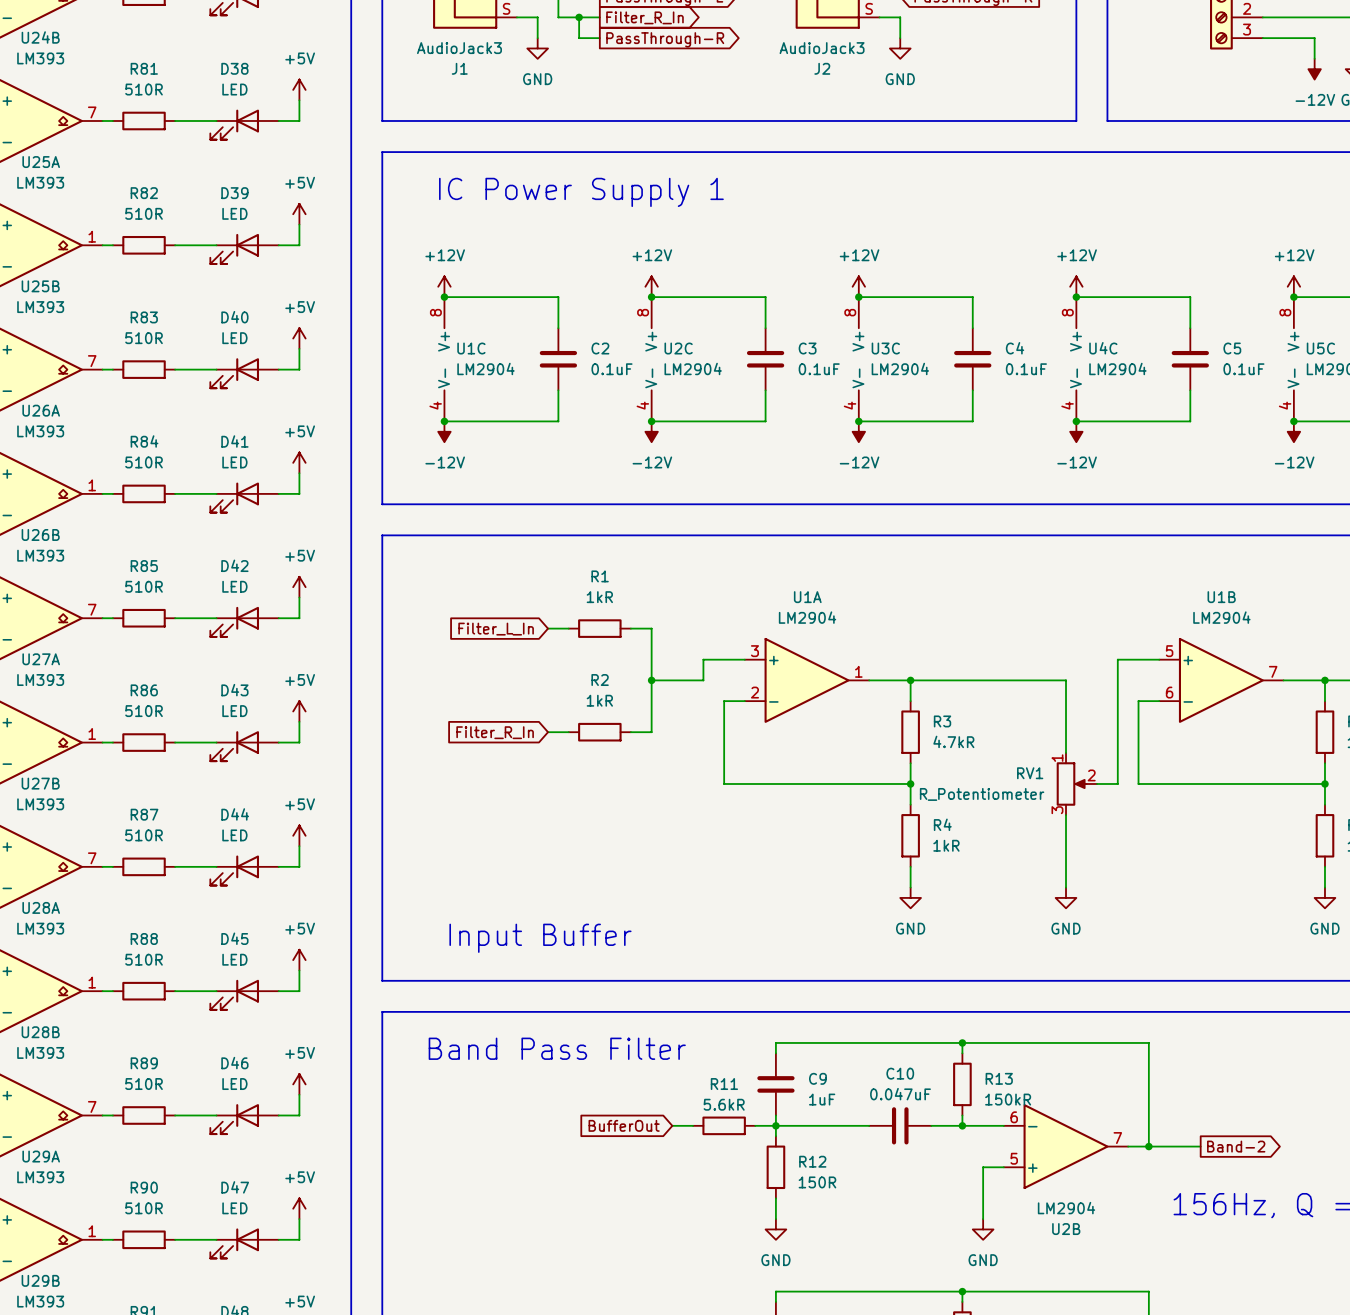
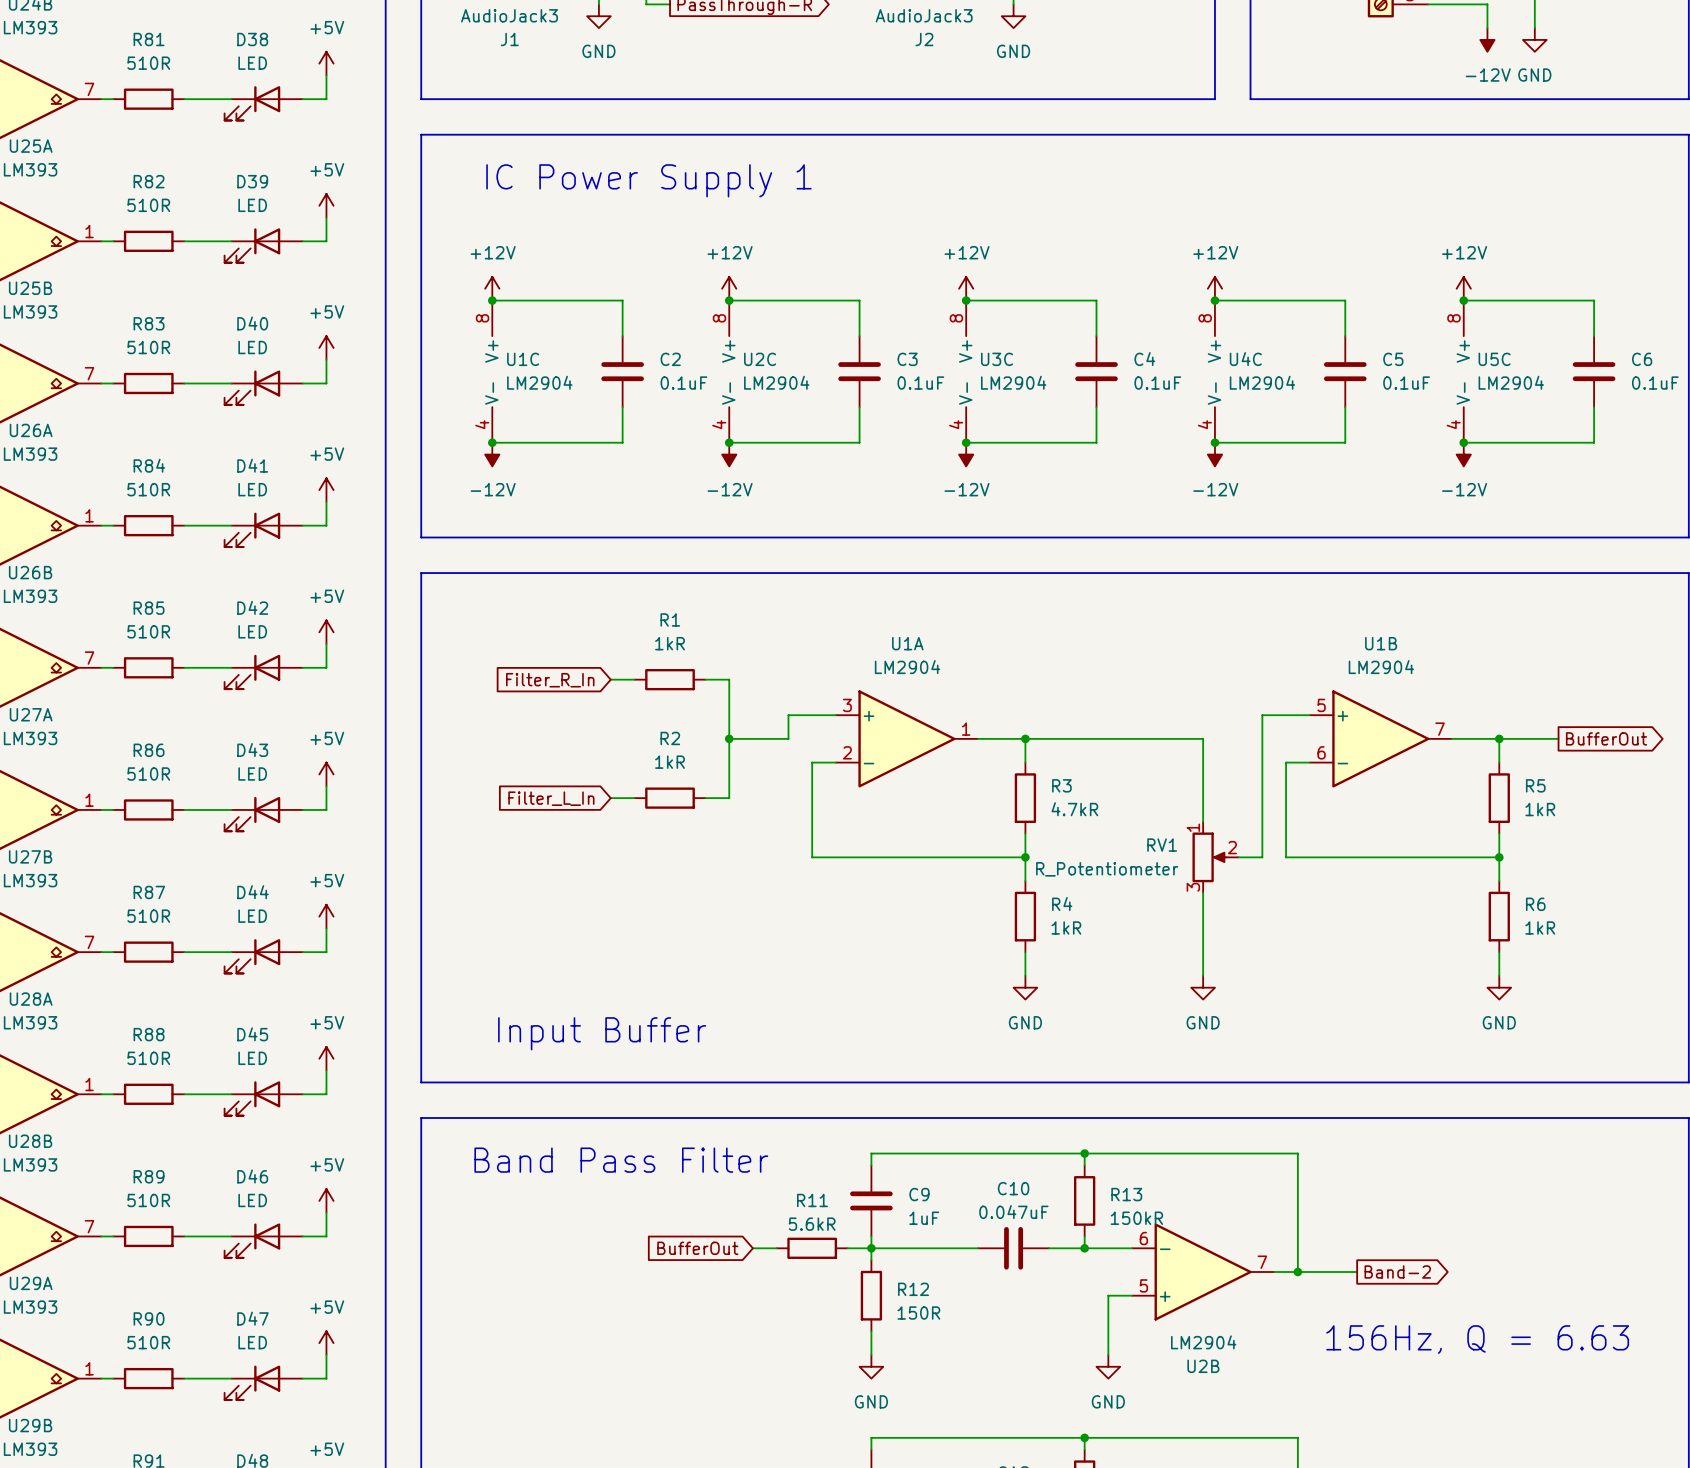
global label: Filter_L_In (496, 629) -> Filter_R_In (550, 680)
global label: Filter_R_In (495, 732) -> Filter_L_In (551, 798)

